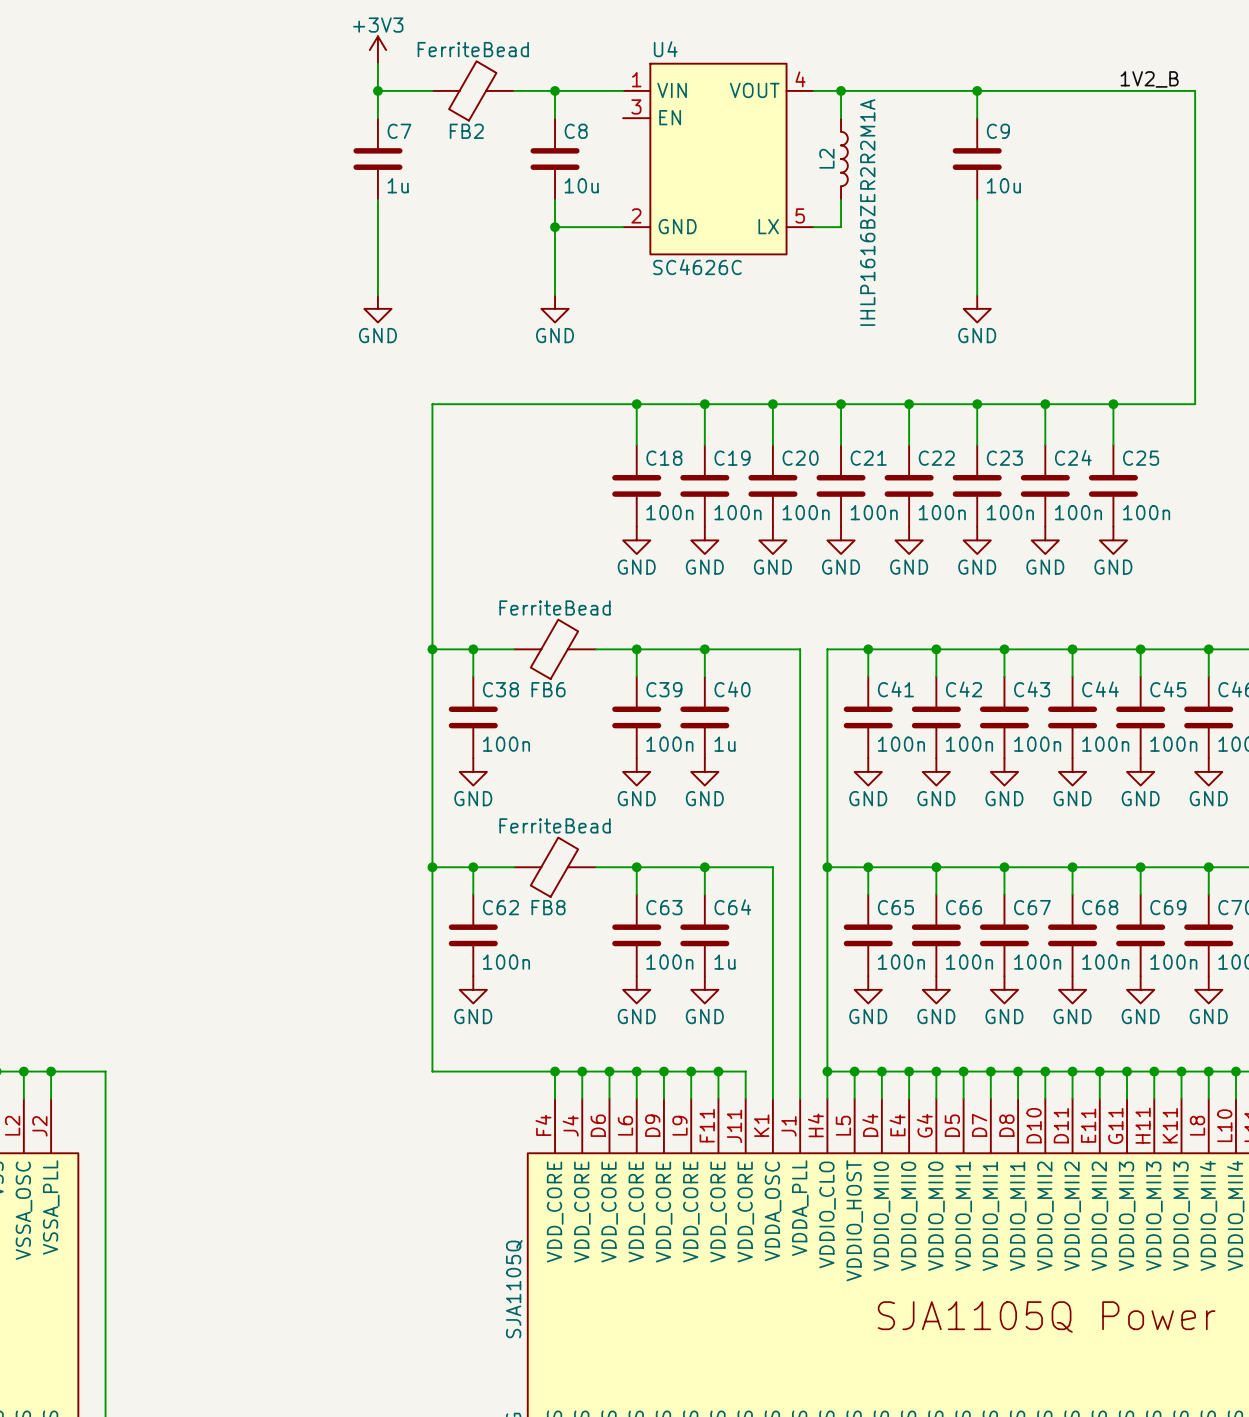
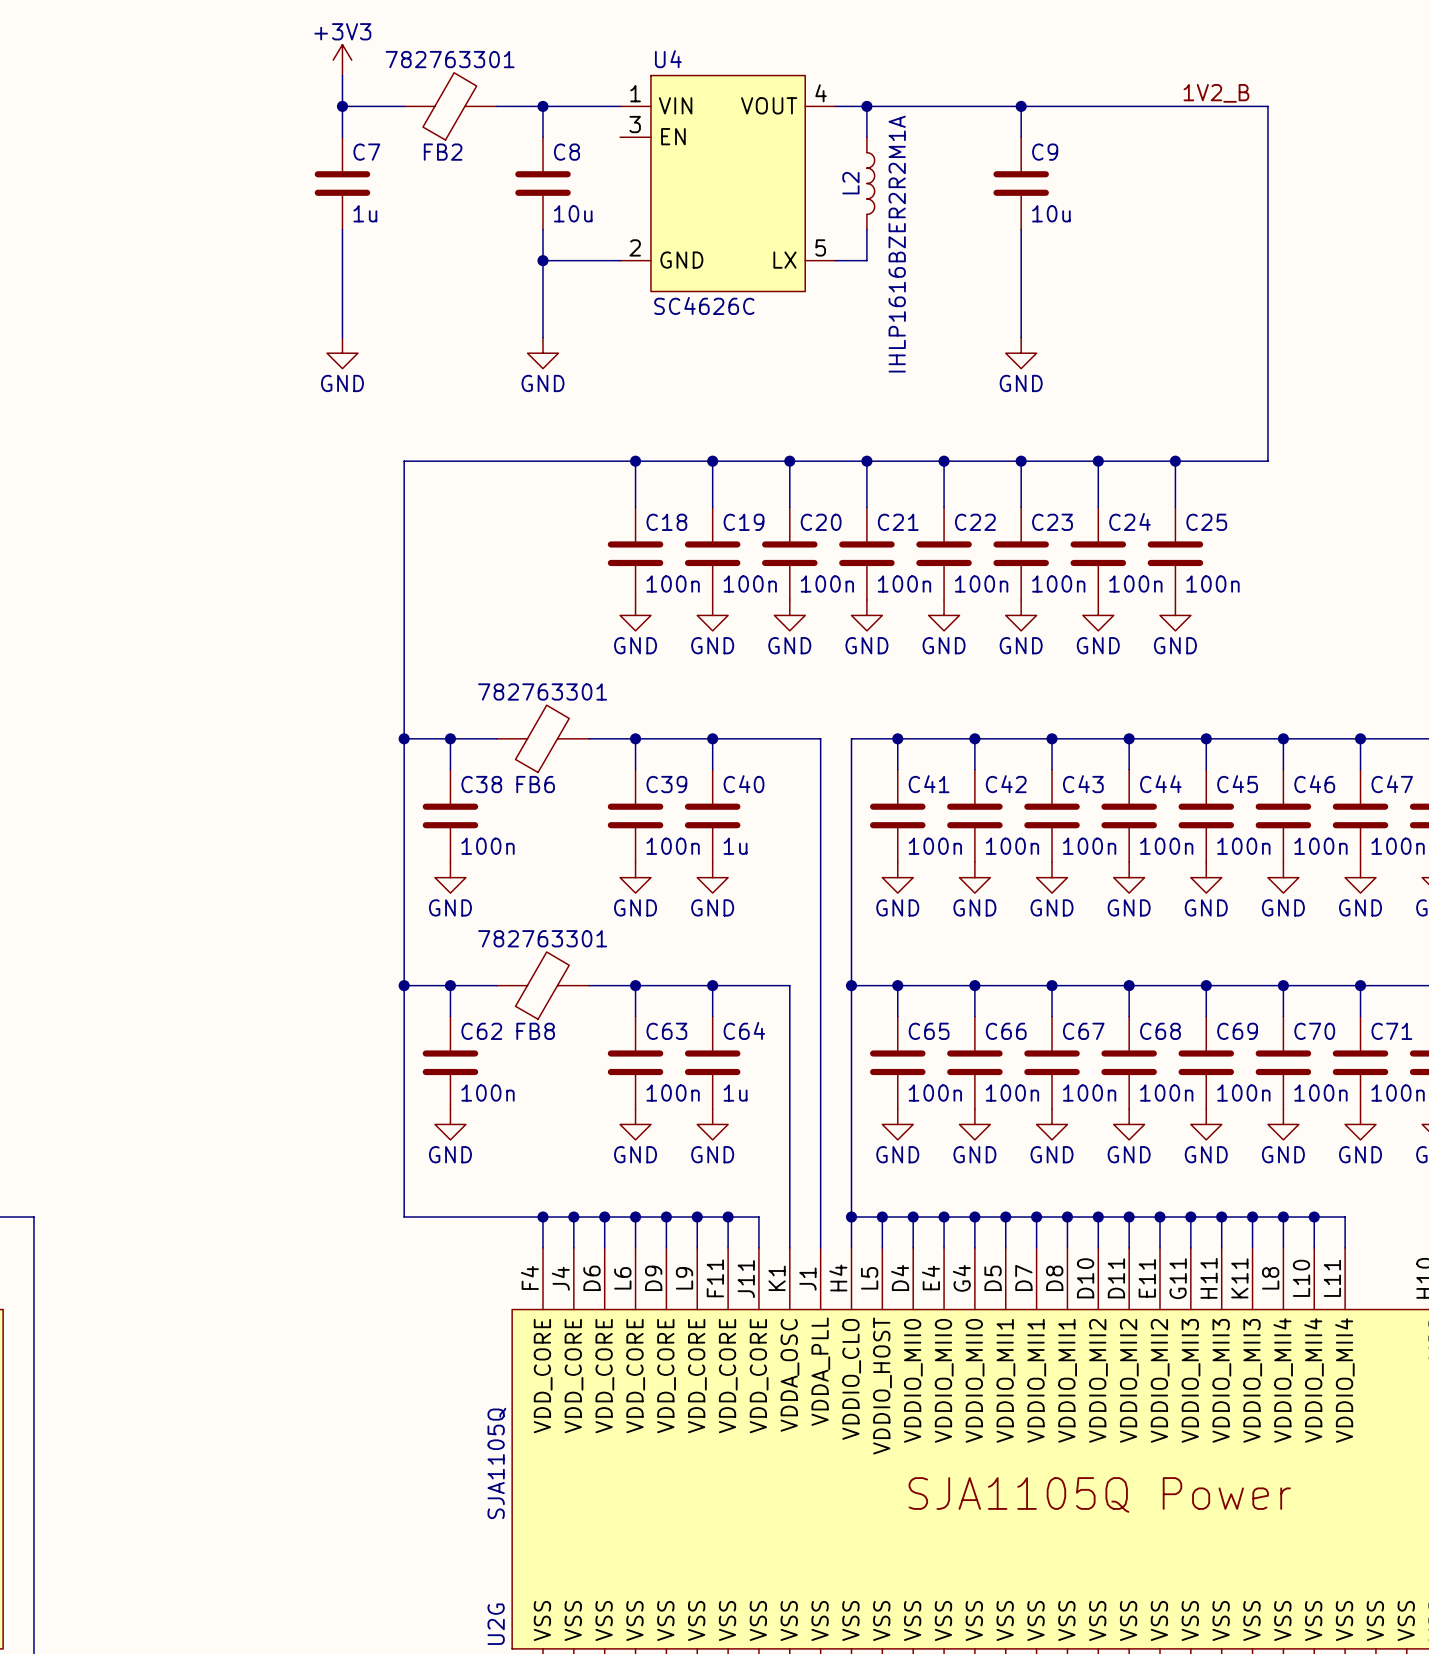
FB2 value: FerriteBead (473, 49) -> 782763301 (450, 59)
FB6 value: FerriteBead (555, 607) -> 782763301 (542, 691)
FB8 value: FerriteBead (555, 825) -> 782763301 (542, 938)

